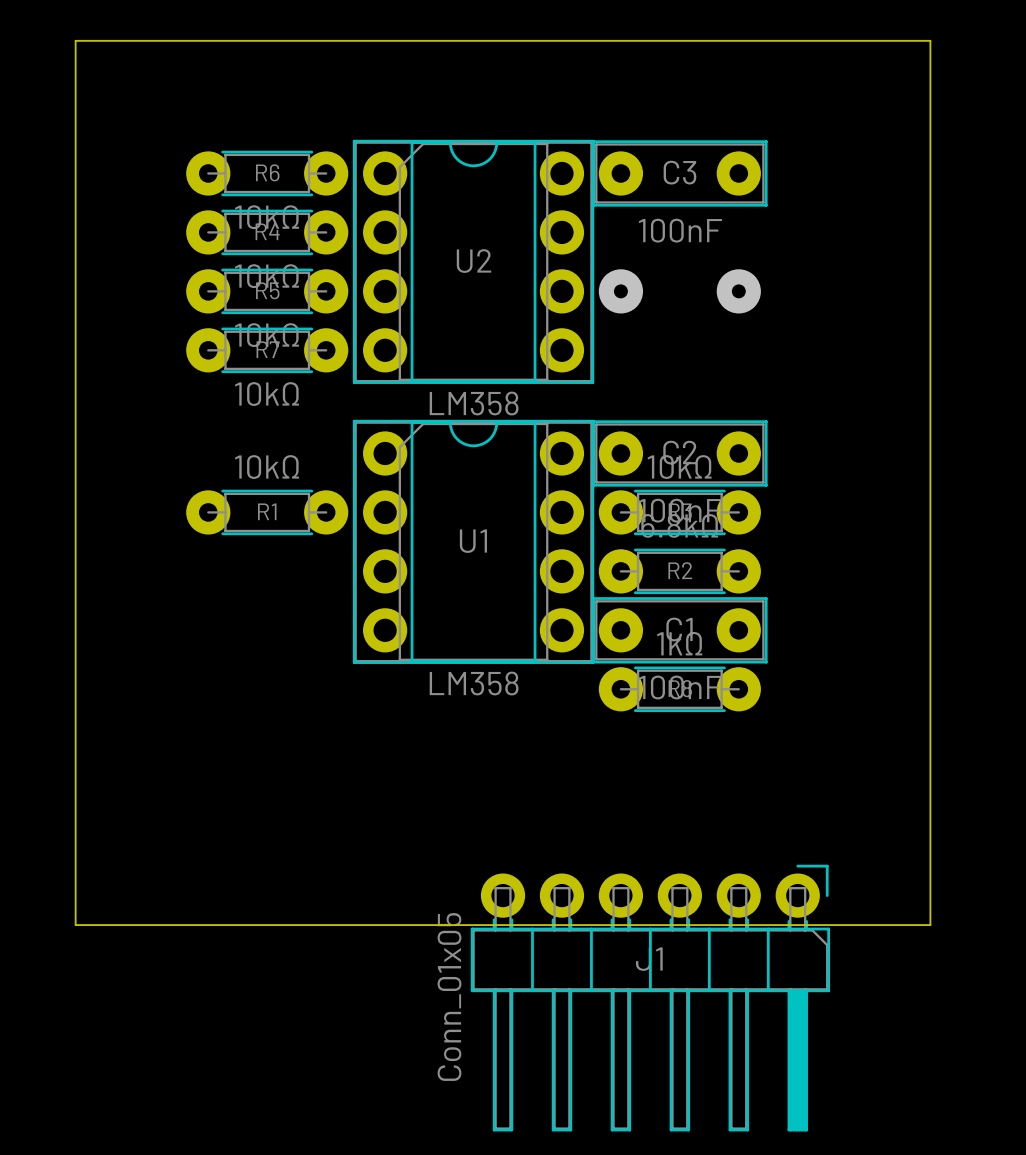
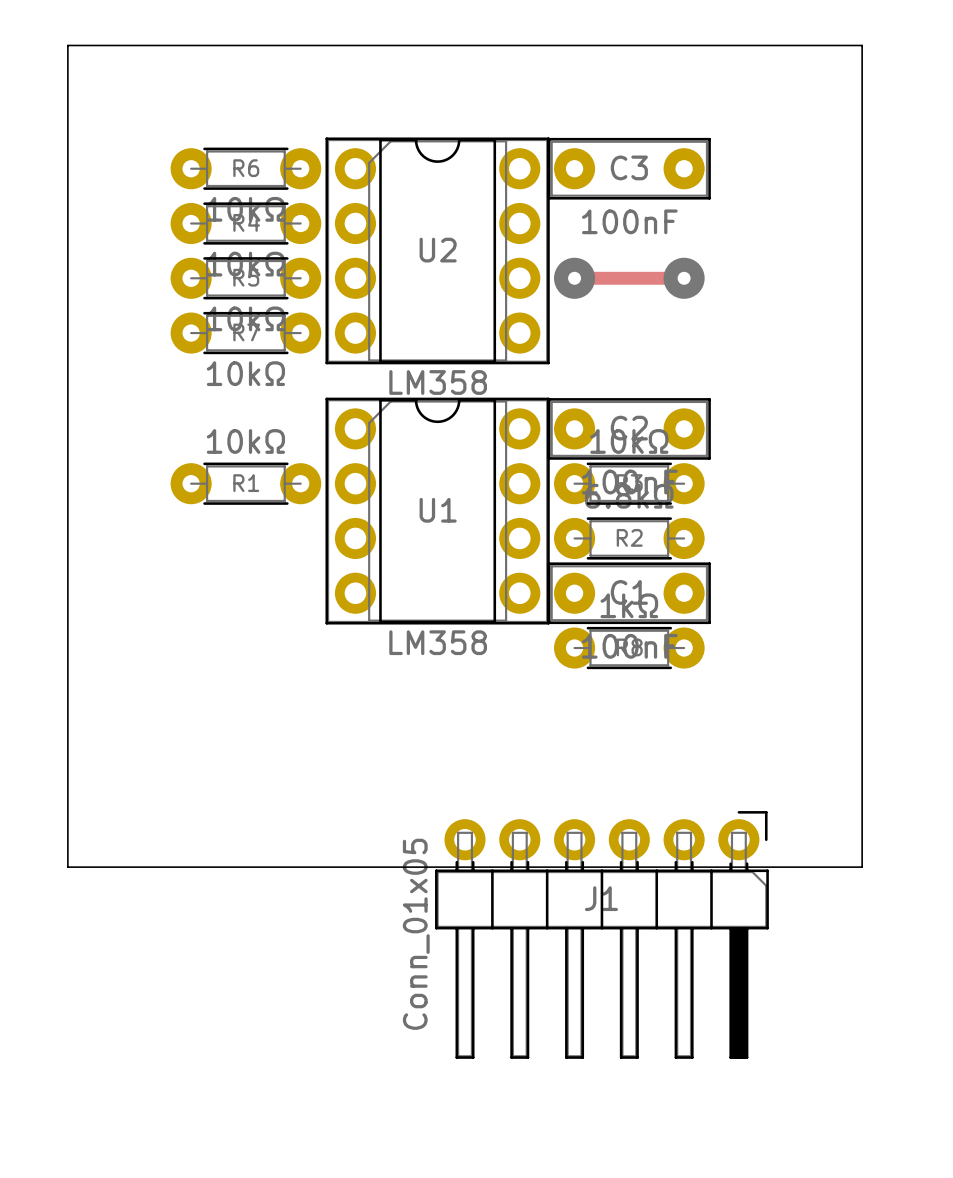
track: none -> (574, 278) (684, 278)

